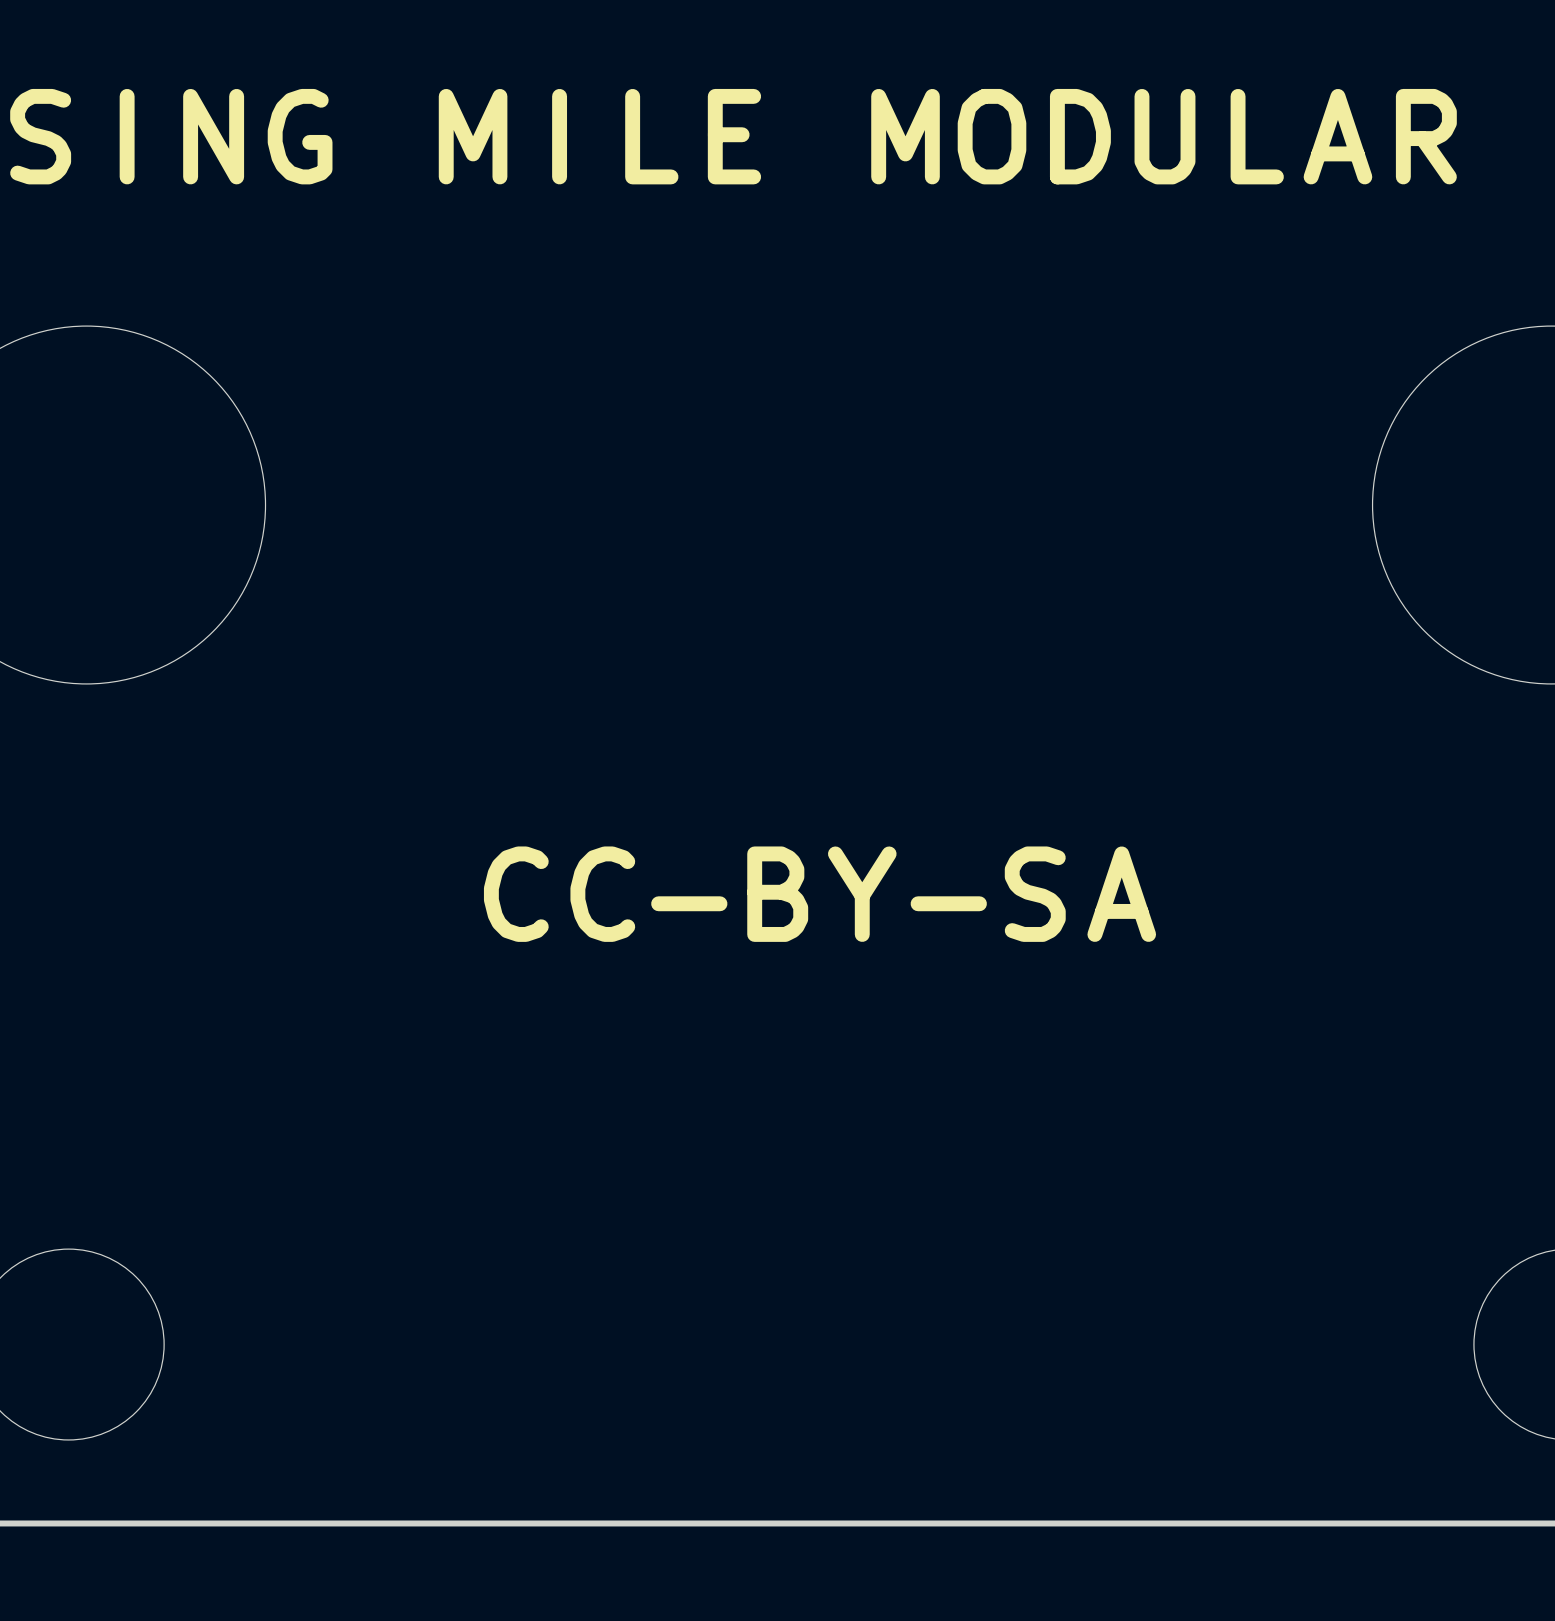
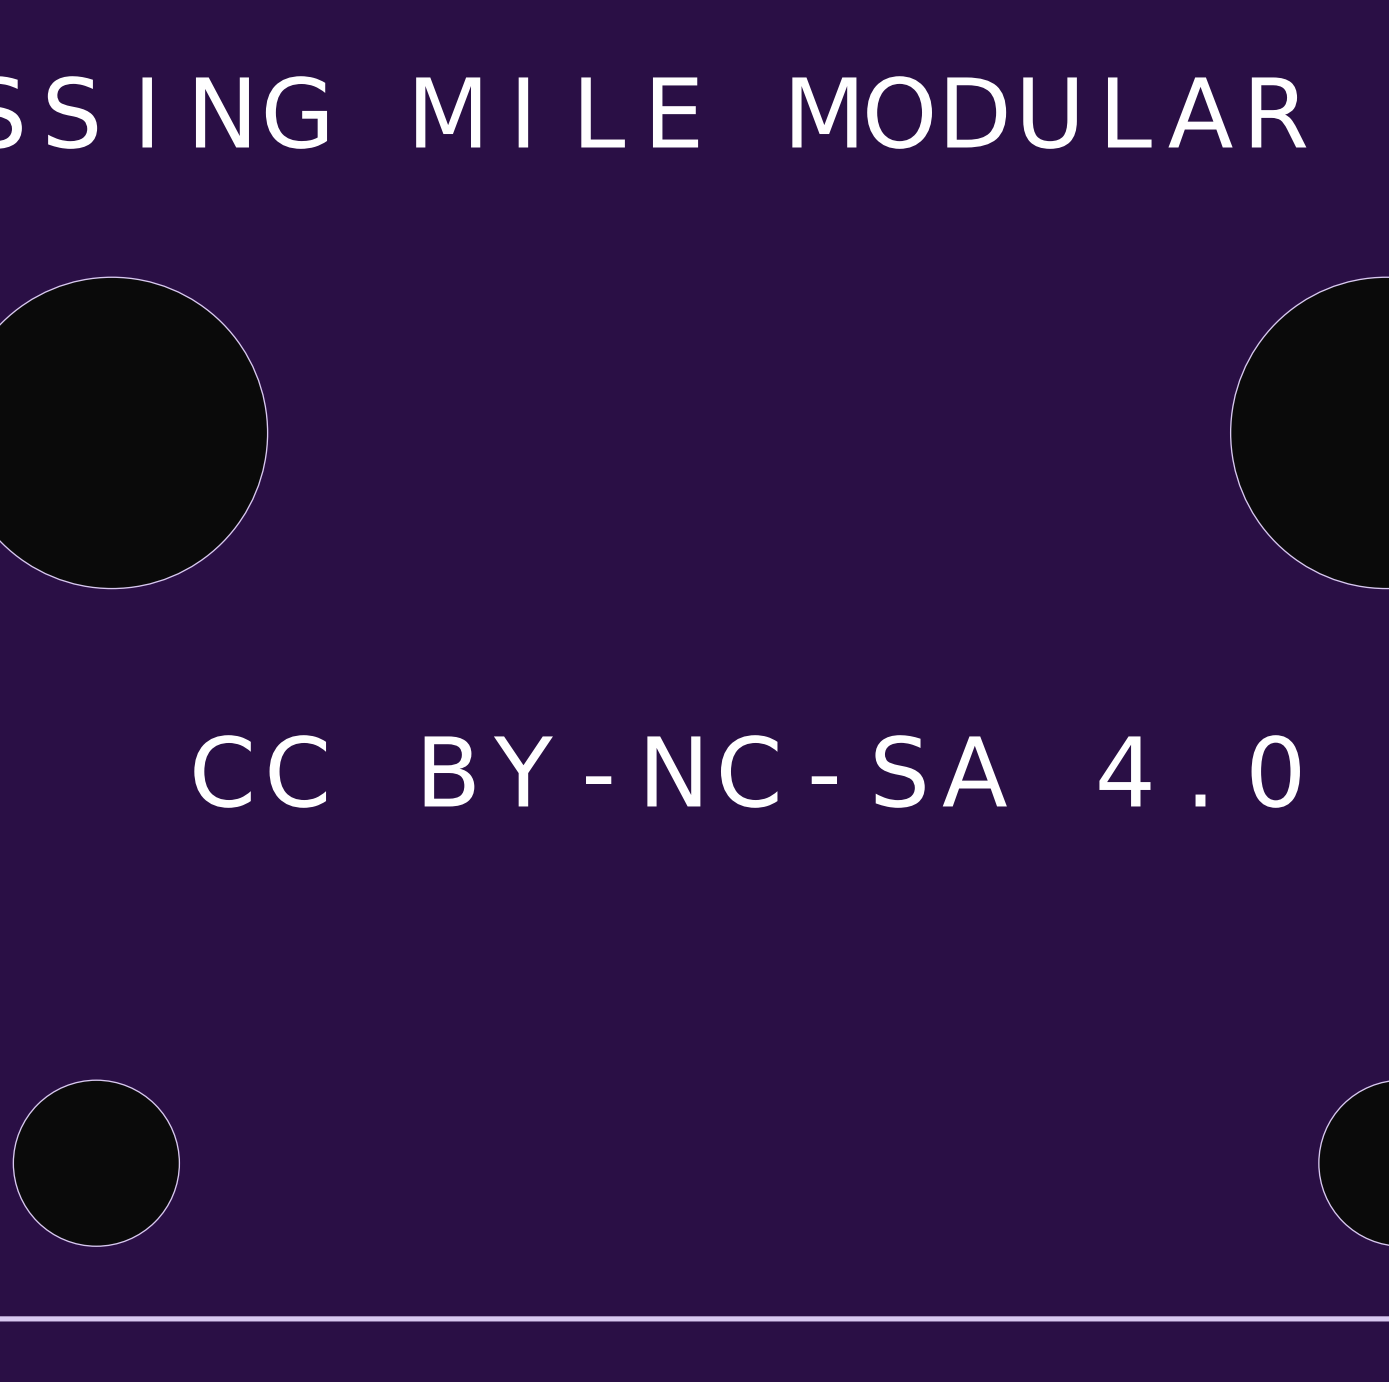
text: none -> 4 (1124, 771)
text: none -> C (222, 771)
text: none -> C (297, 771)
text: C (516, 894) -> none
text: C (602, 894) -> none
text: none -> N (673, 771)
text position: B (777, 894) -> B (449, 771)
text: none -> C (749, 771)
text position: Y (862, 894) -> Y (523, 771)
text position: S (1035, 894) -> S (900, 771)
text position: A (1121, 894) -> A (974, 771)
text: none -> 0 (1275, 771)
text position: - (689, 903) -> - (598, 780)
text position: - (948, 903) -> - (824, 780)
text: none -> . (1200, 800)

